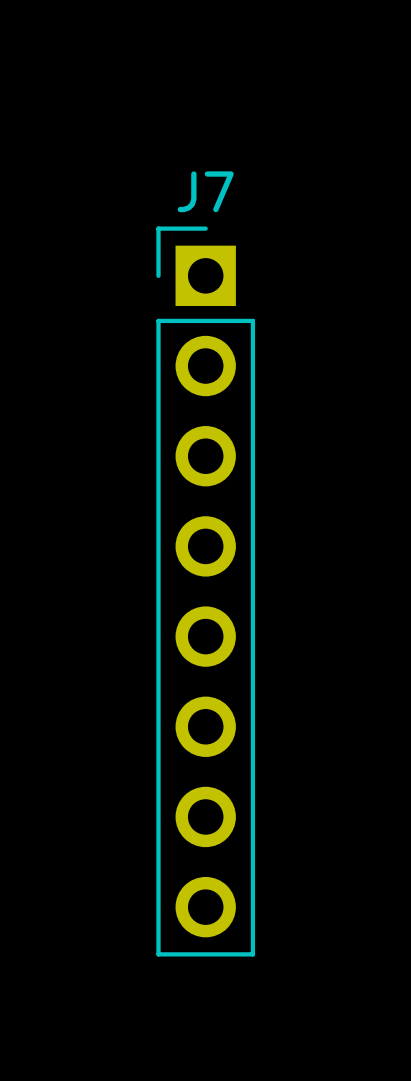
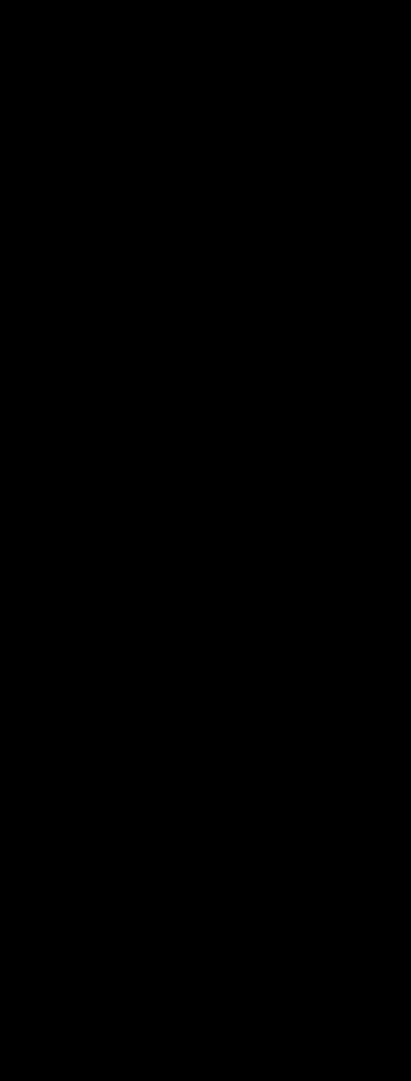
J7: (205, 591) -> none

